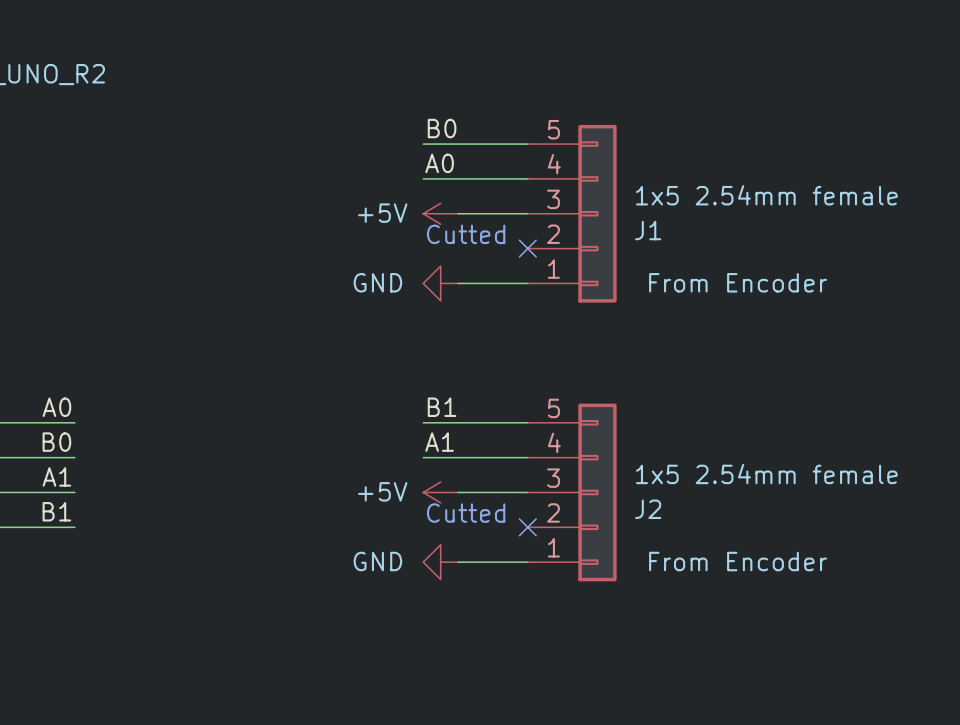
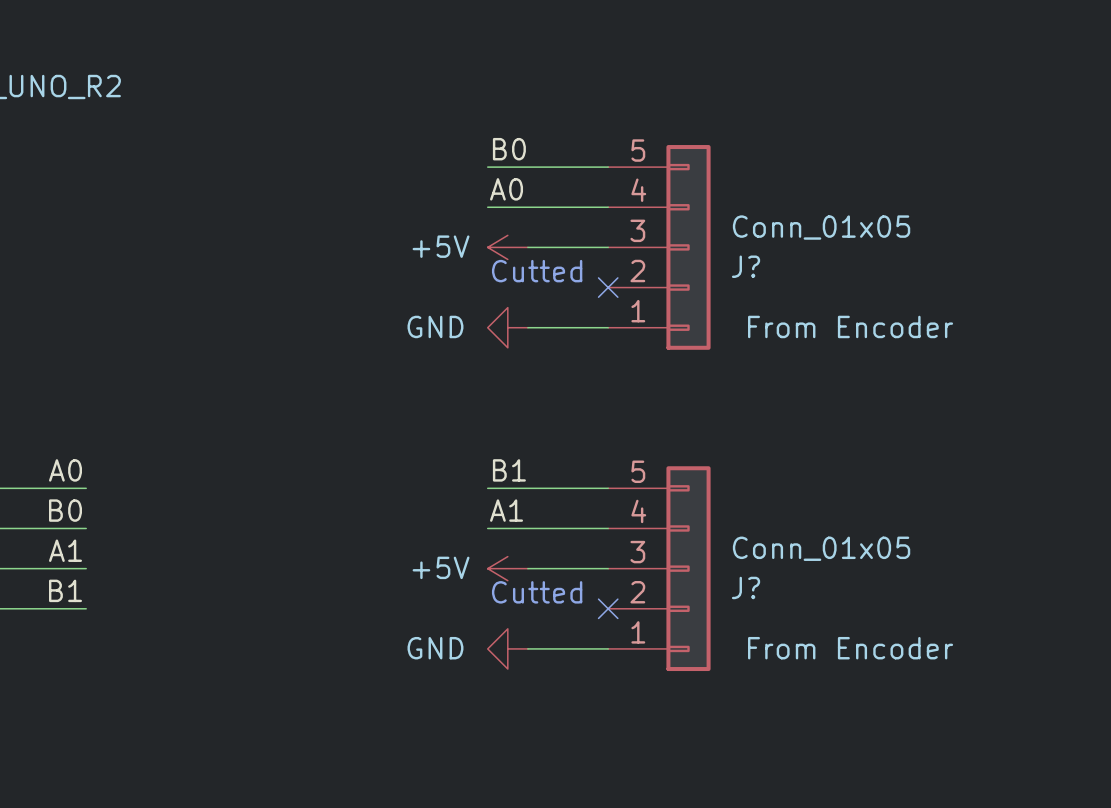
J1 value: 1x5 2.54mm female (766, 195) -> Conn_01x05 (821, 227)
J1 name: J1 (648, 230) -> J? (746, 266)
J2 value: 1x5 2.54mm female (766, 474) -> Conn_01x05 (821, 548)
J2 name: J2 (648, 509) -> J? (746, 587)

